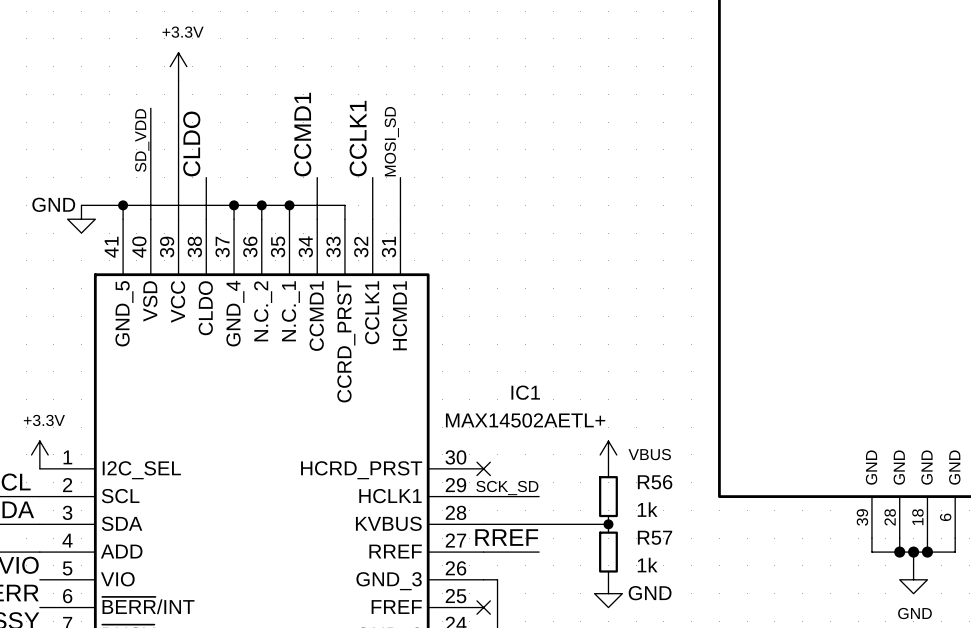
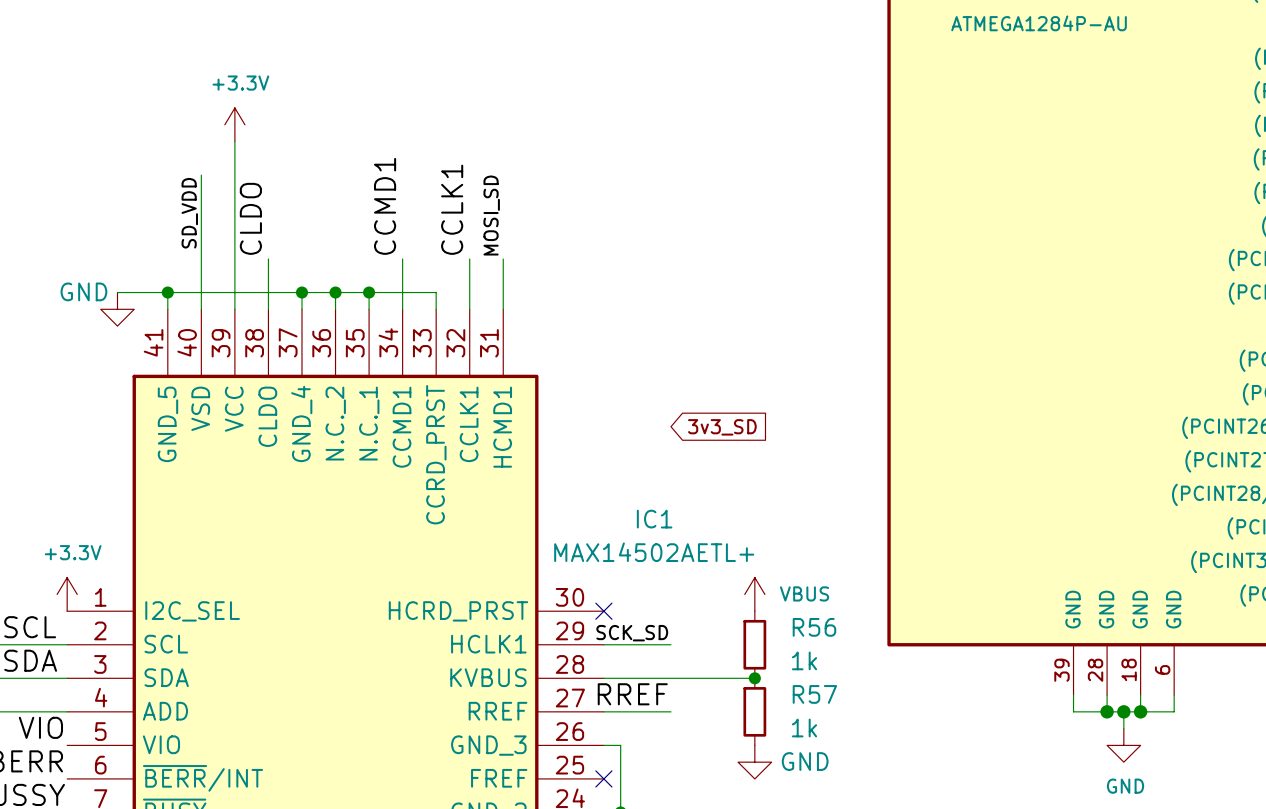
global label: none -> 3v3_SD (722, 427)

